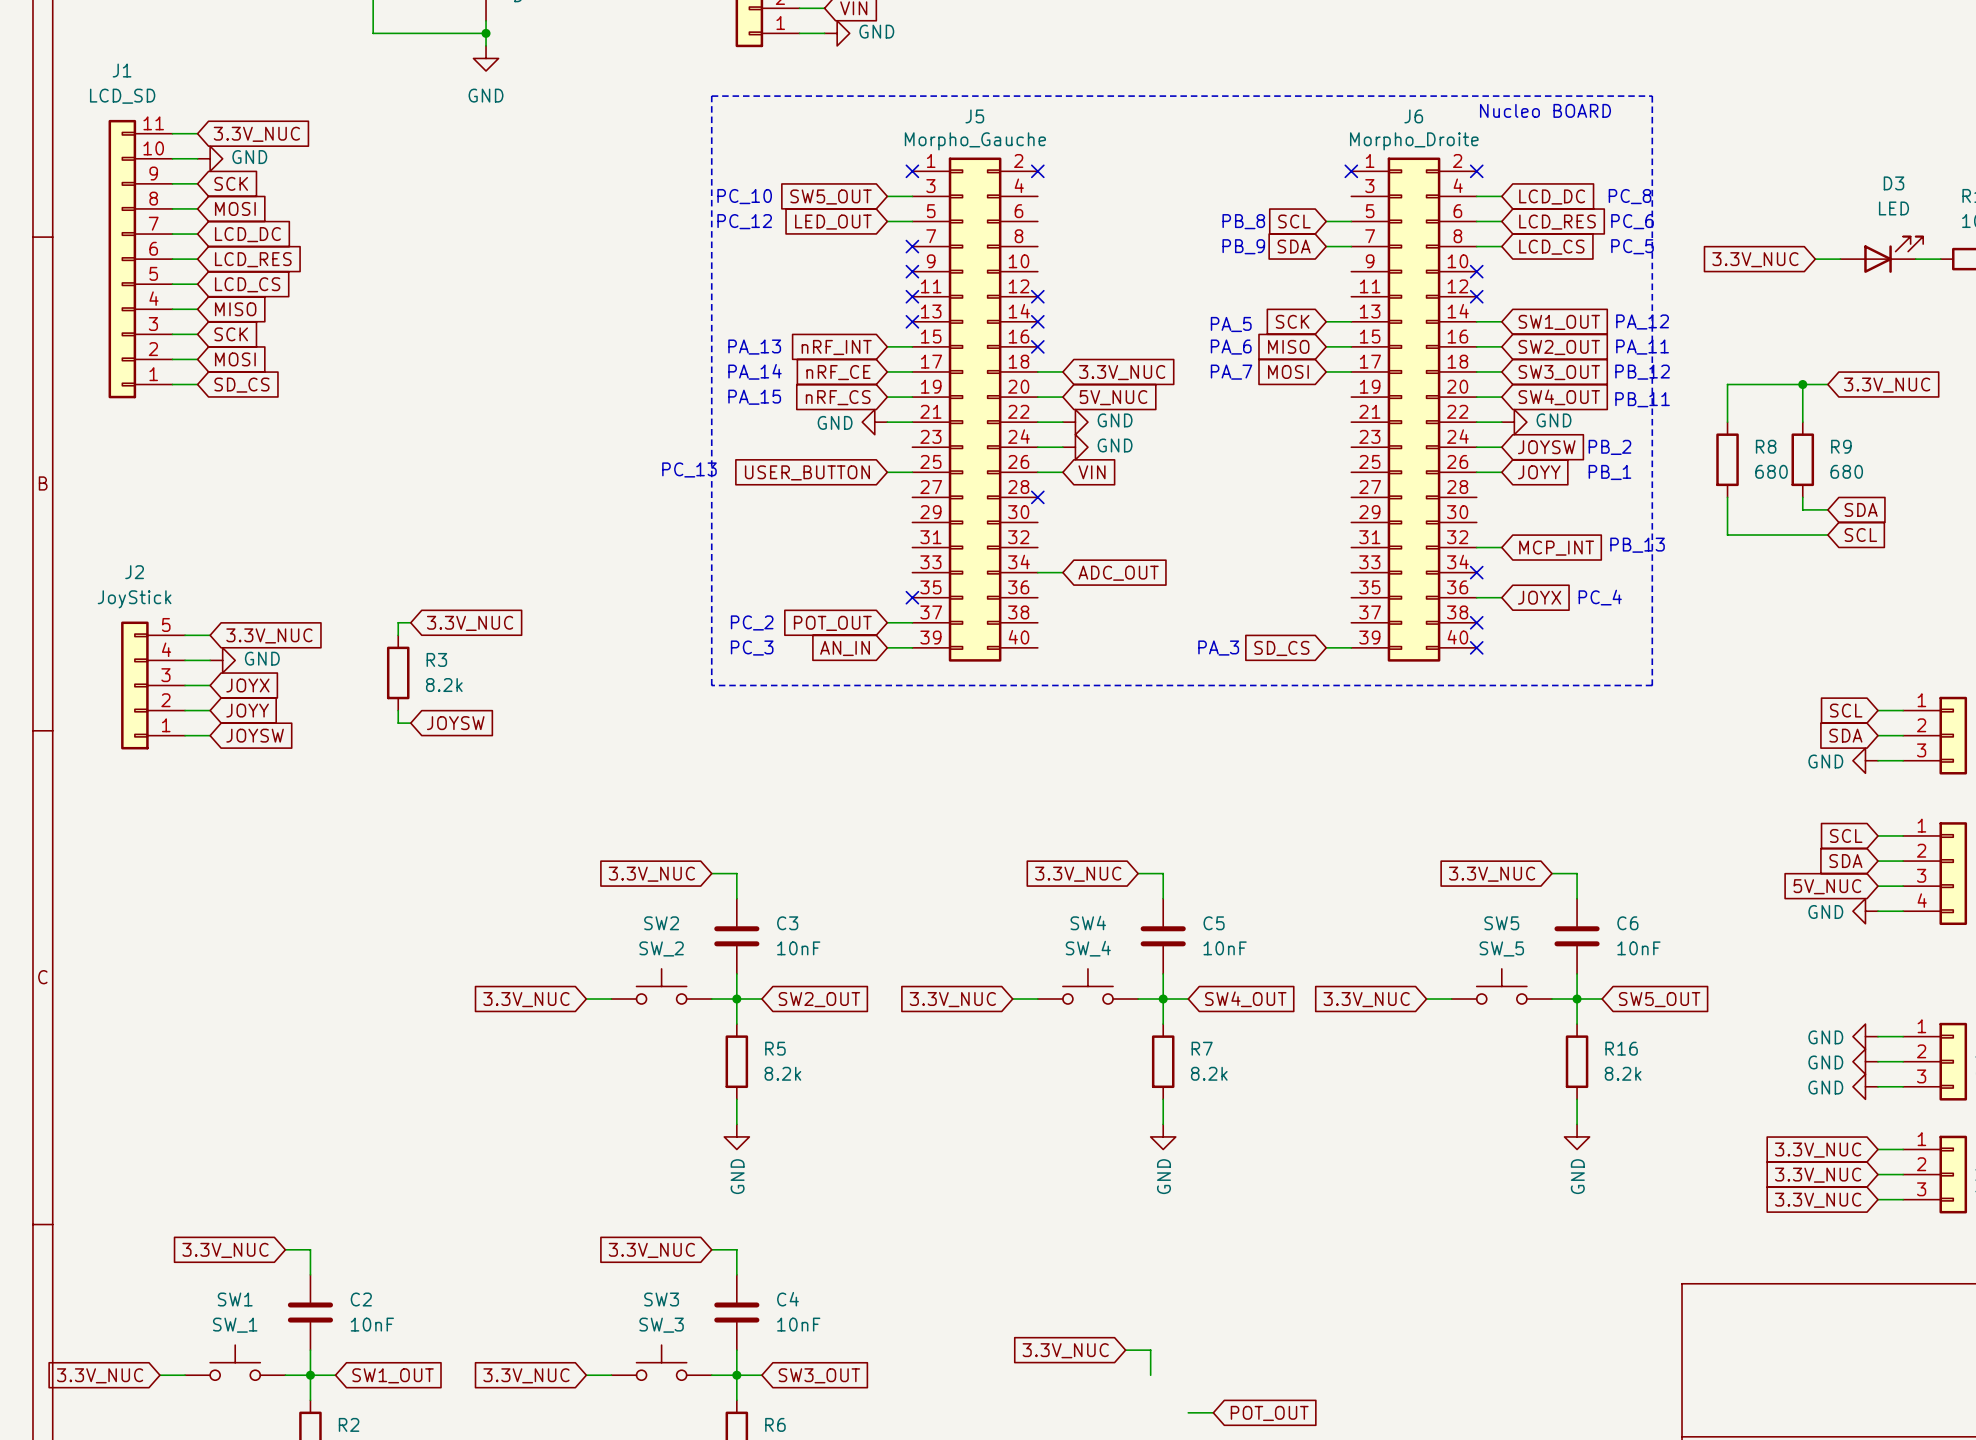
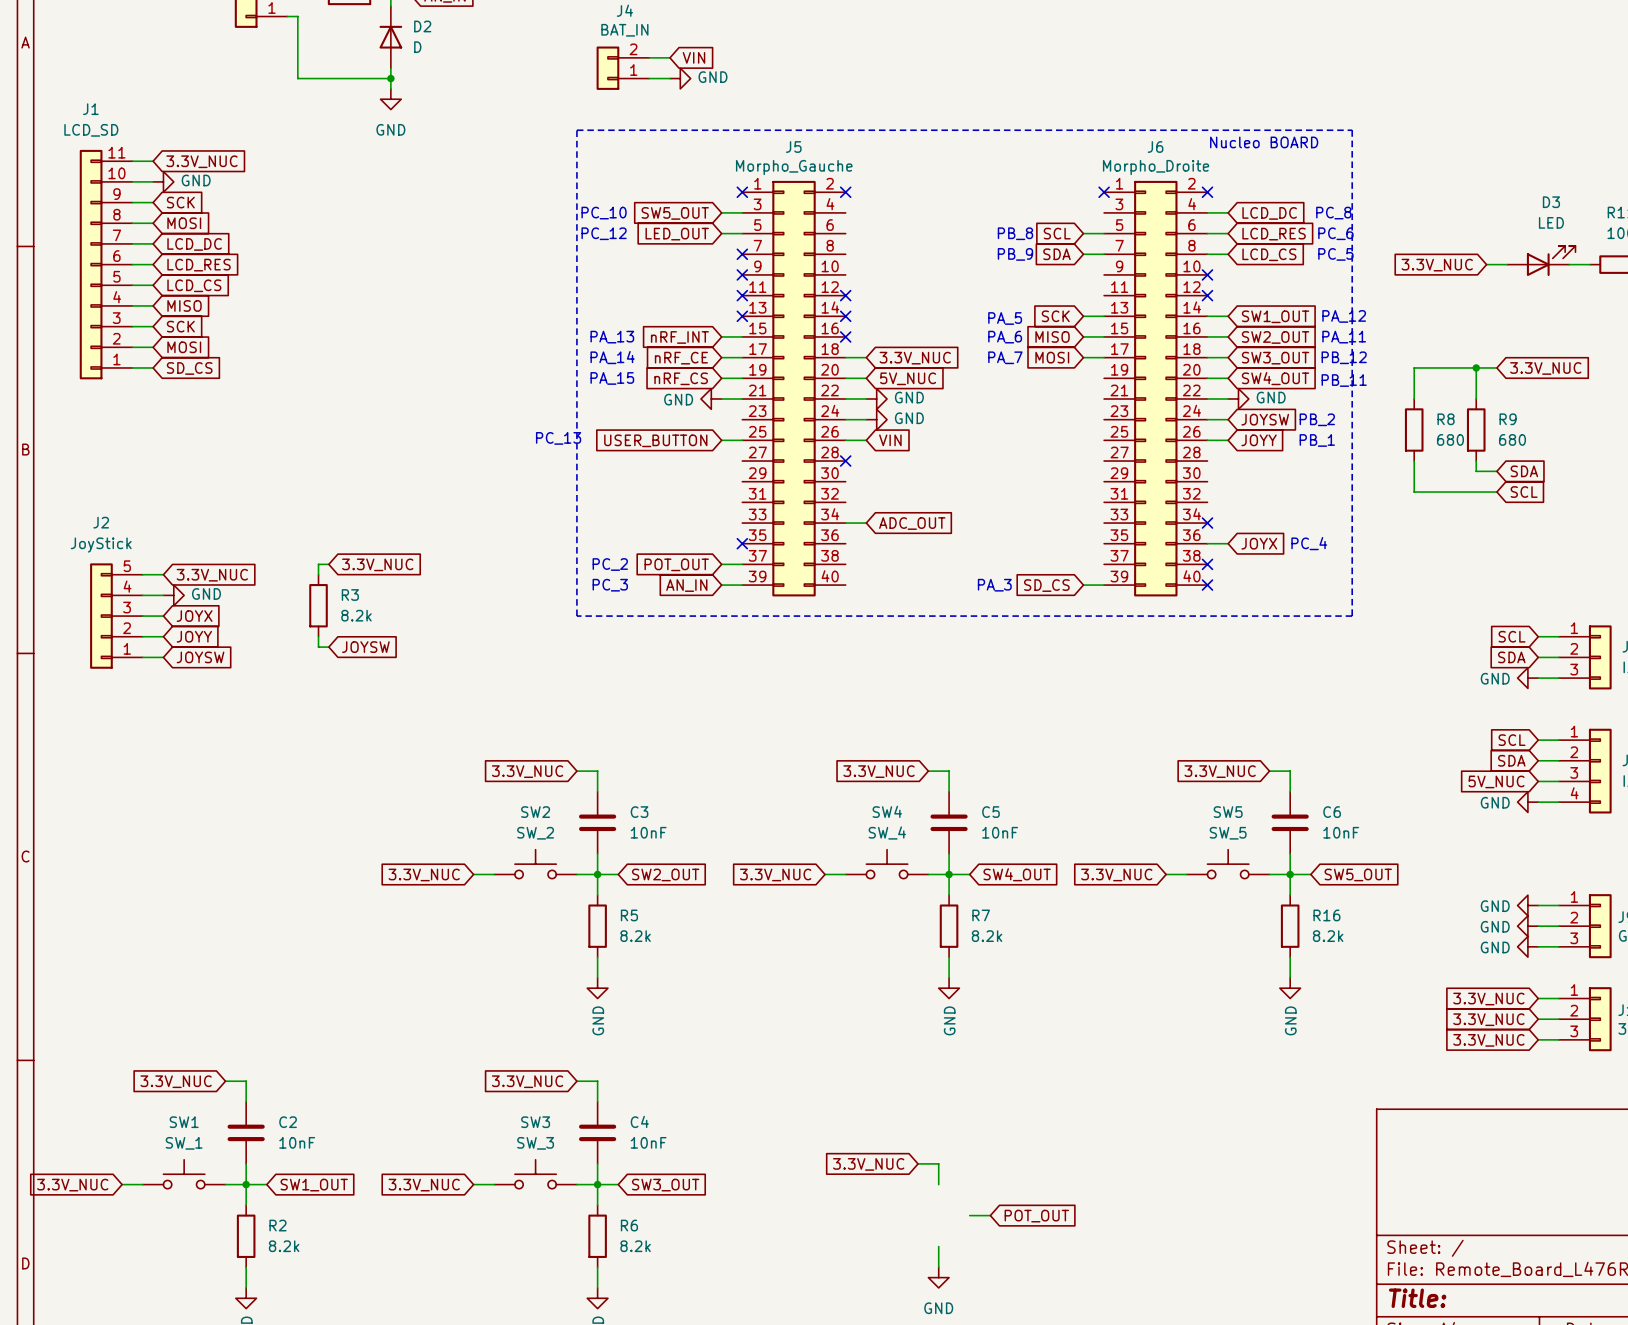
text: PB_13 (1637, 545) -> none
wire: (1476, 547) (1501, 547) -> none
global label: MCP_INT (1556, 548) -> none

